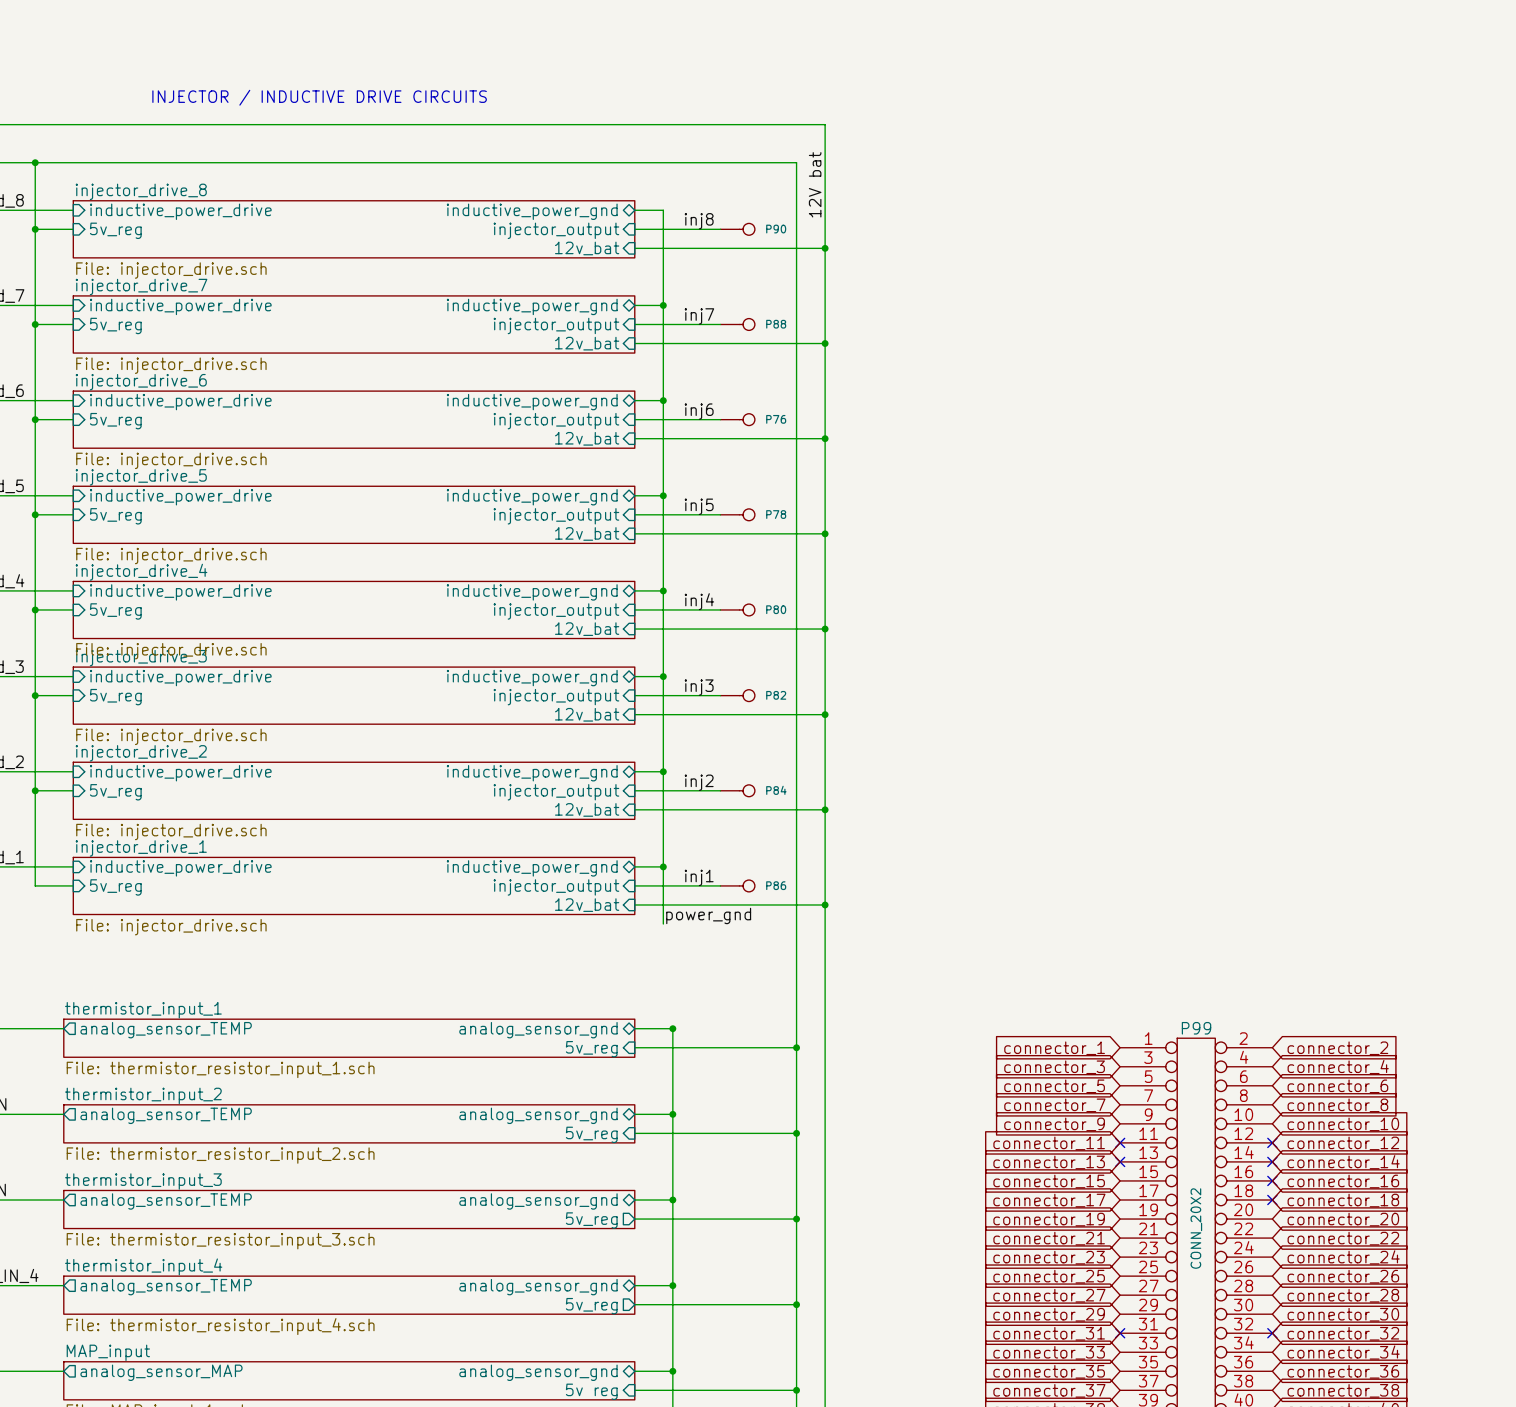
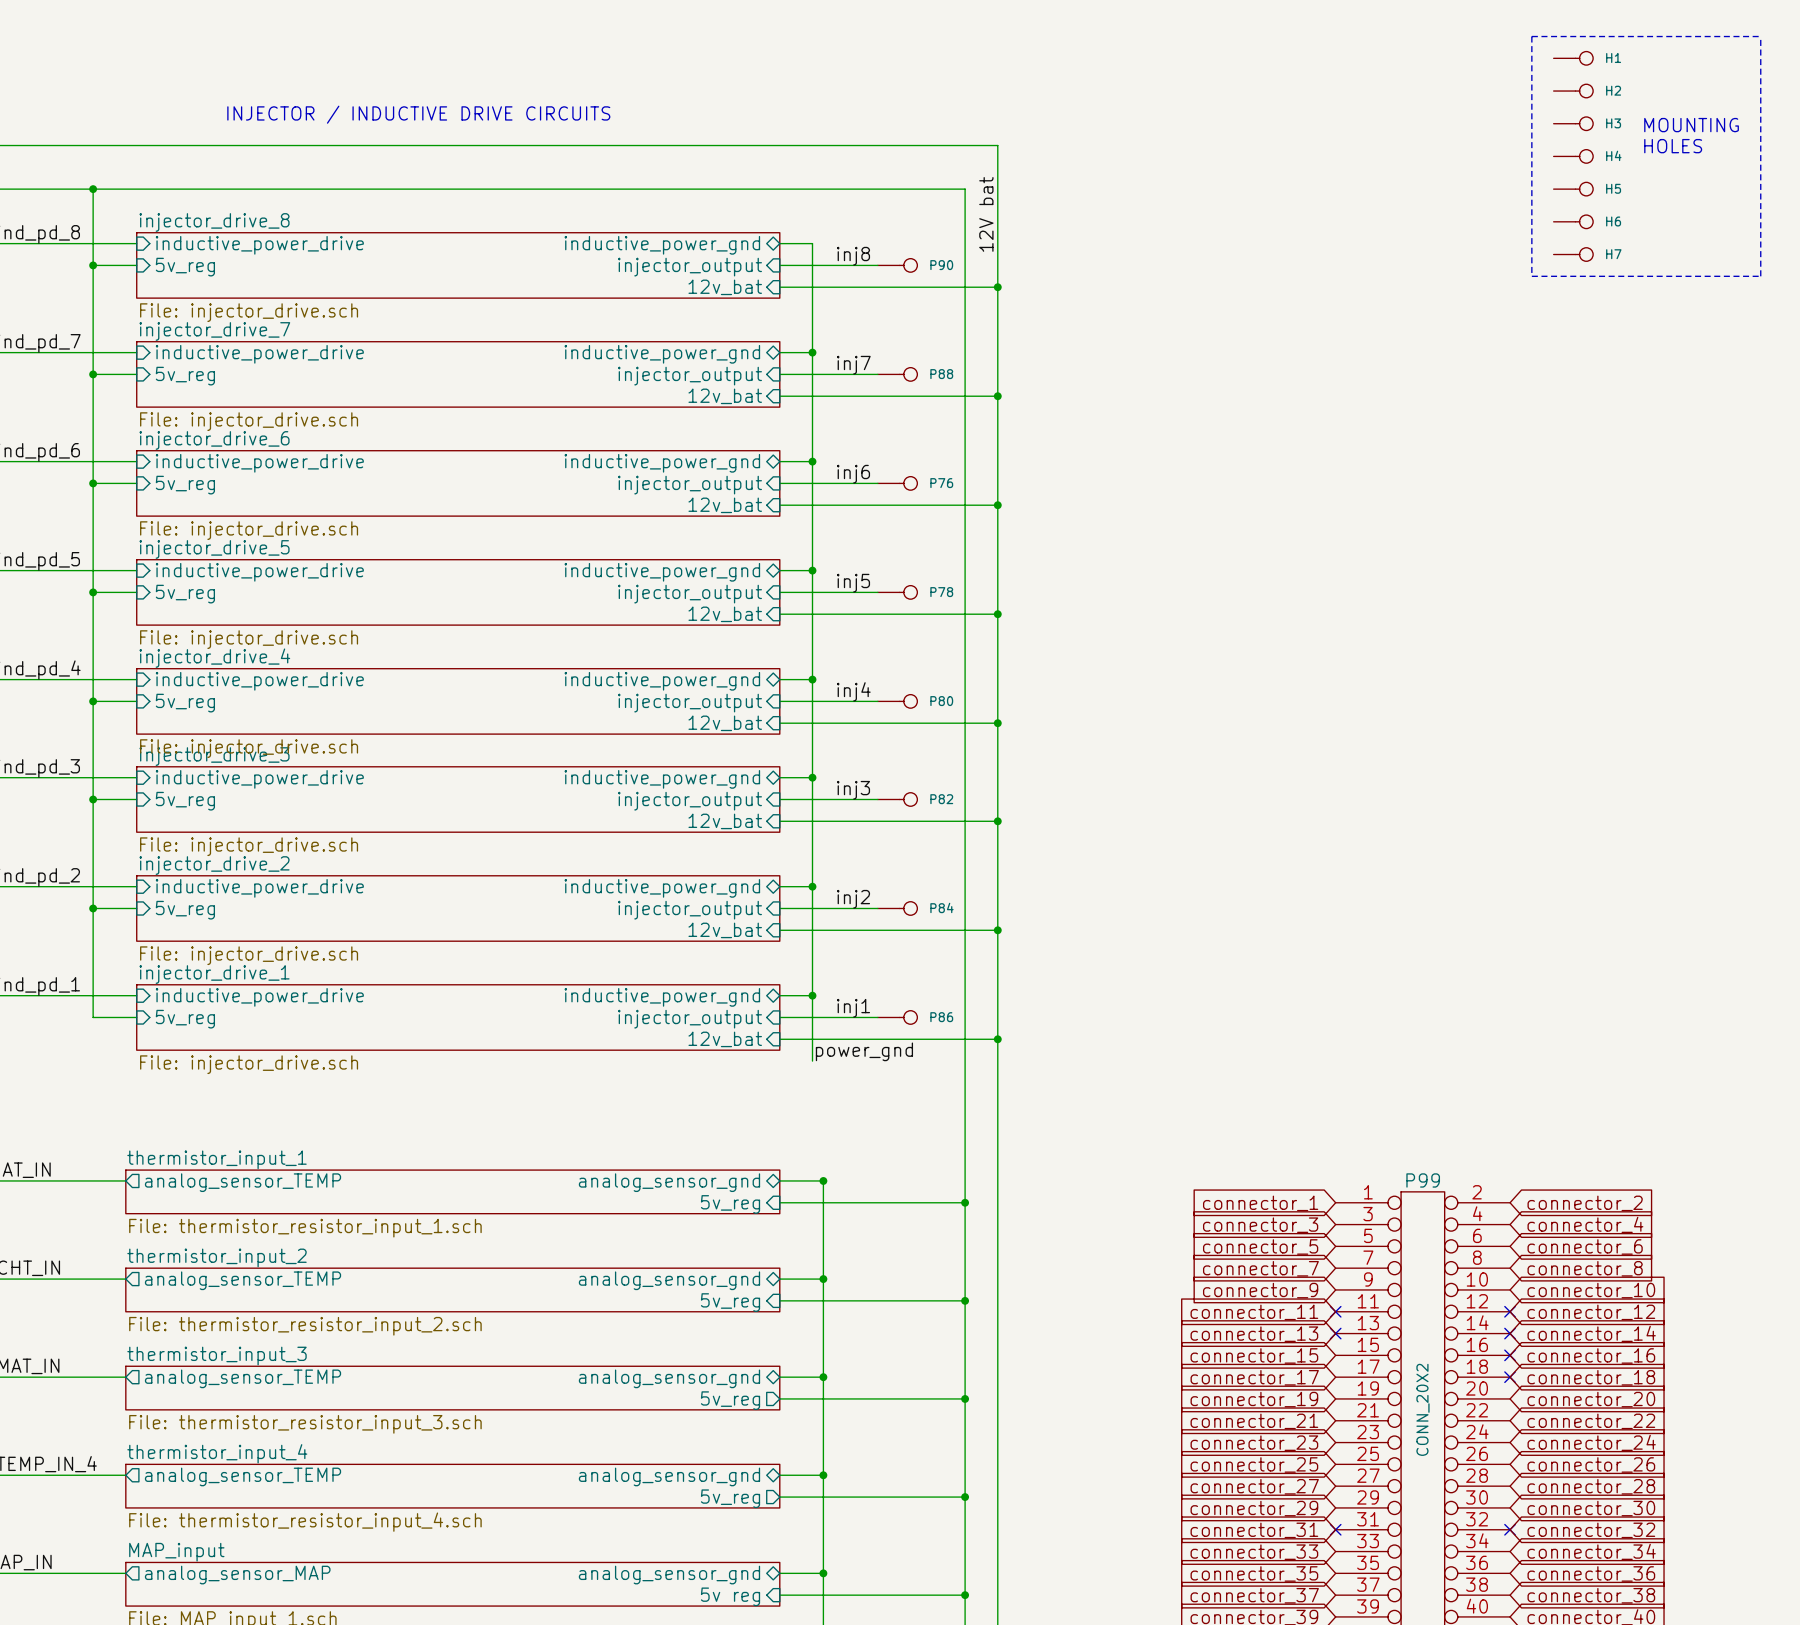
line: none -> (1531, 36) (1760, 36) (1760, 276) (1531, 276) (1531, 36)
H1: none -> (1573, 58)
H2: none -> (1573, 91)
H3: none -> (1573, 123)
text: none -> MOUNTING (1691, 125)
text: none -> HOLES (1673, 146)
H4: none -> (1573, 156)
H5: none -> (1573, 189)
H6: none -> (1573, 221)
H7: none -> (1573, 254)

